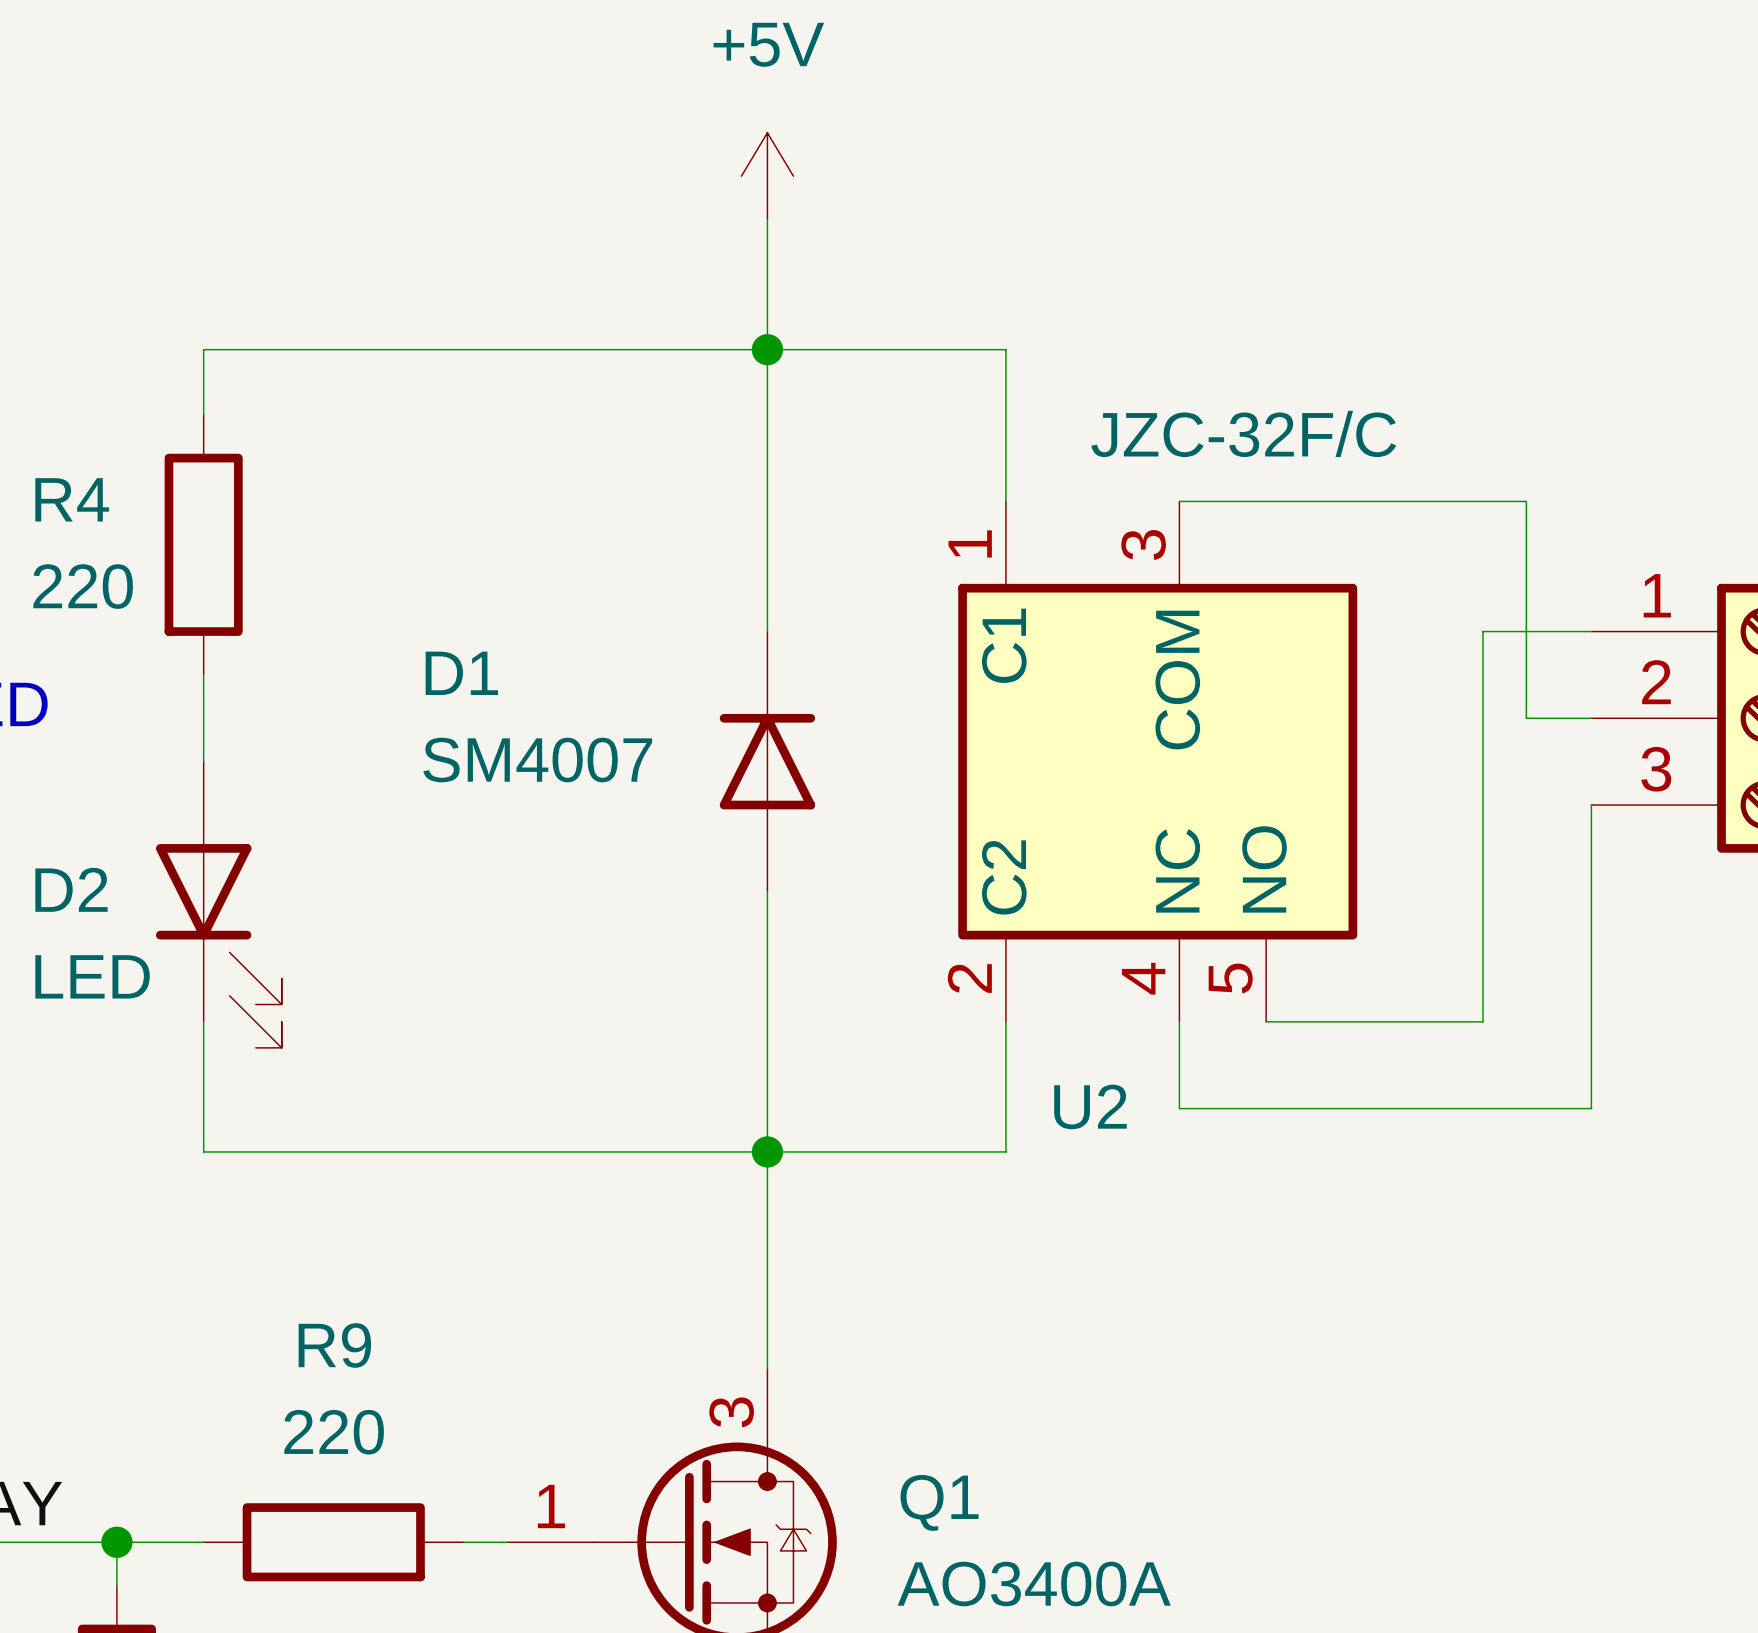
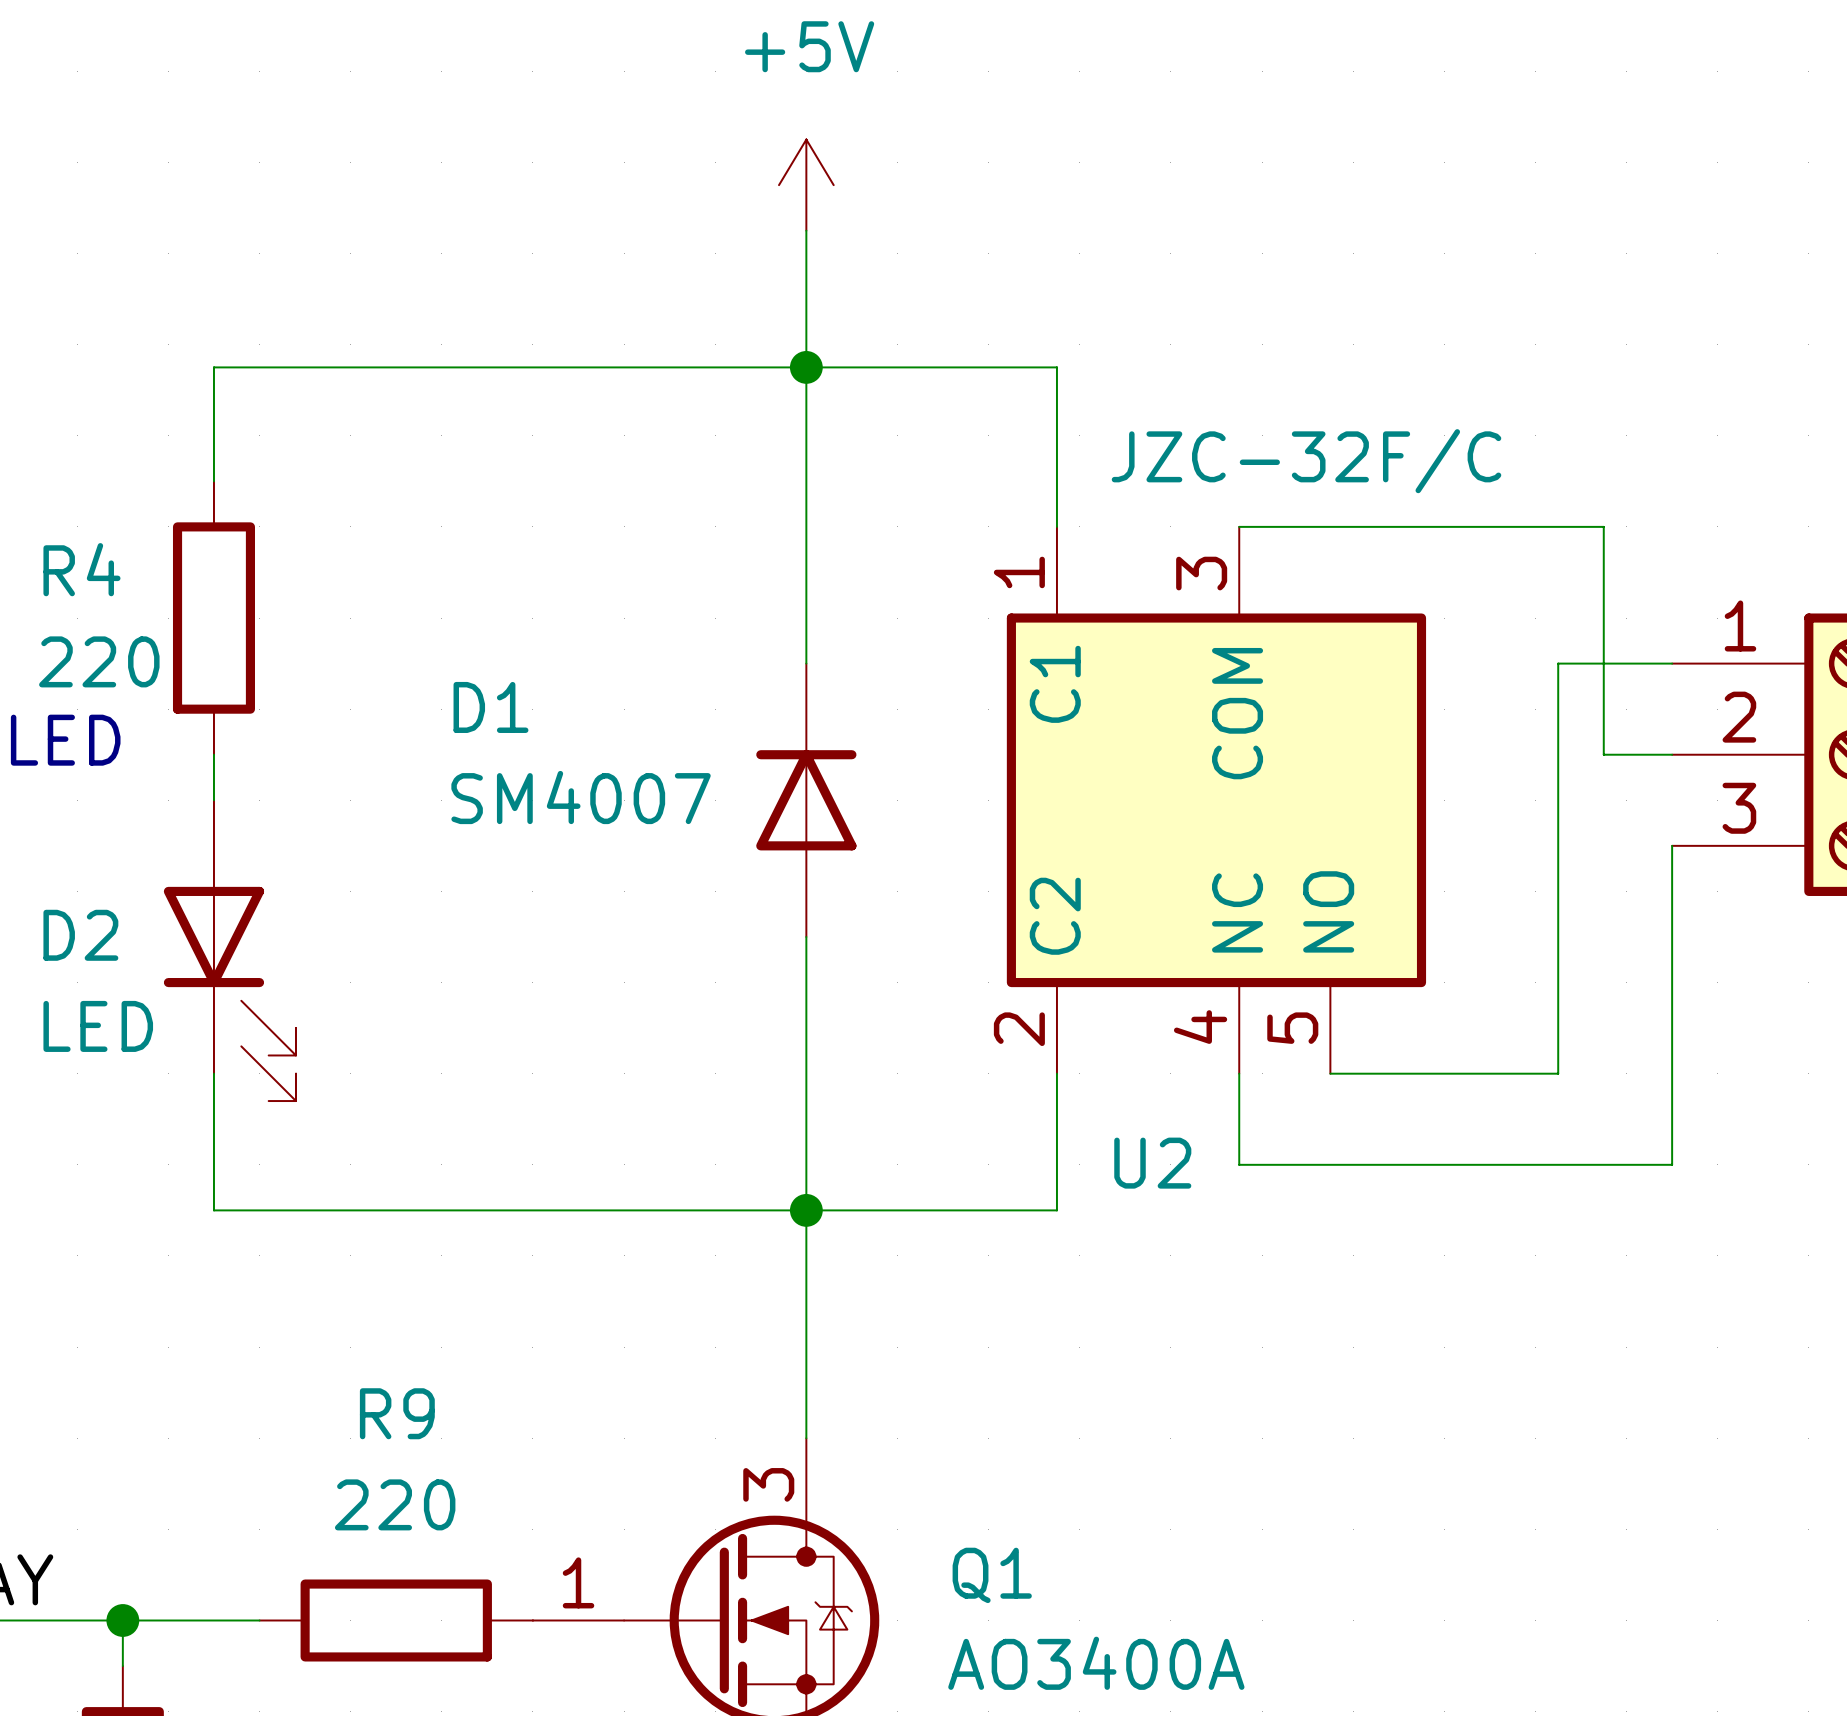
R4 position: (203, 544) -> (213, 618)
R9 position: (333, 1542) -> (396, 1620)

